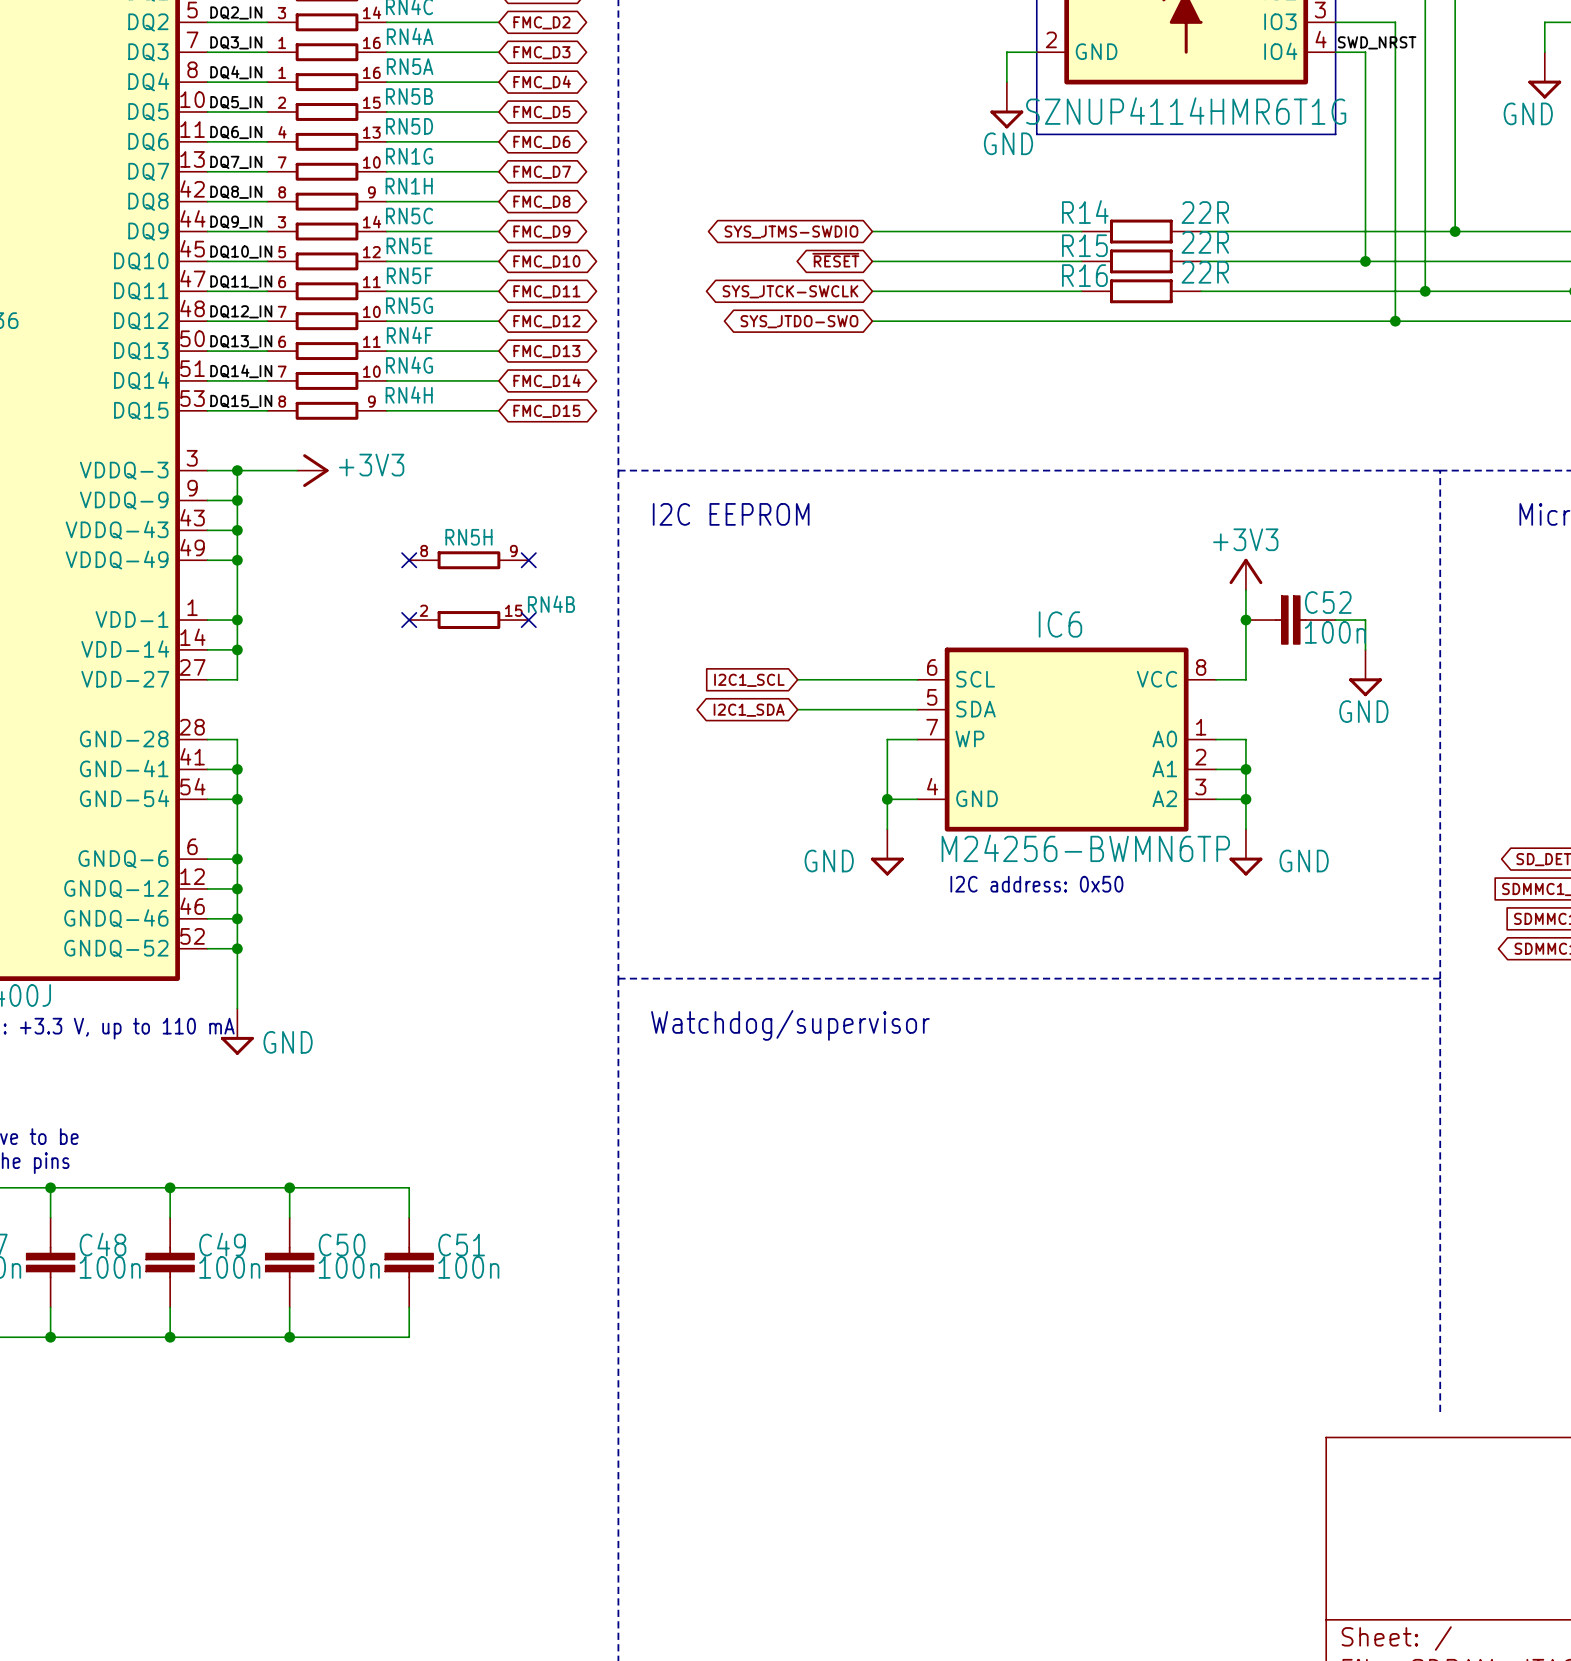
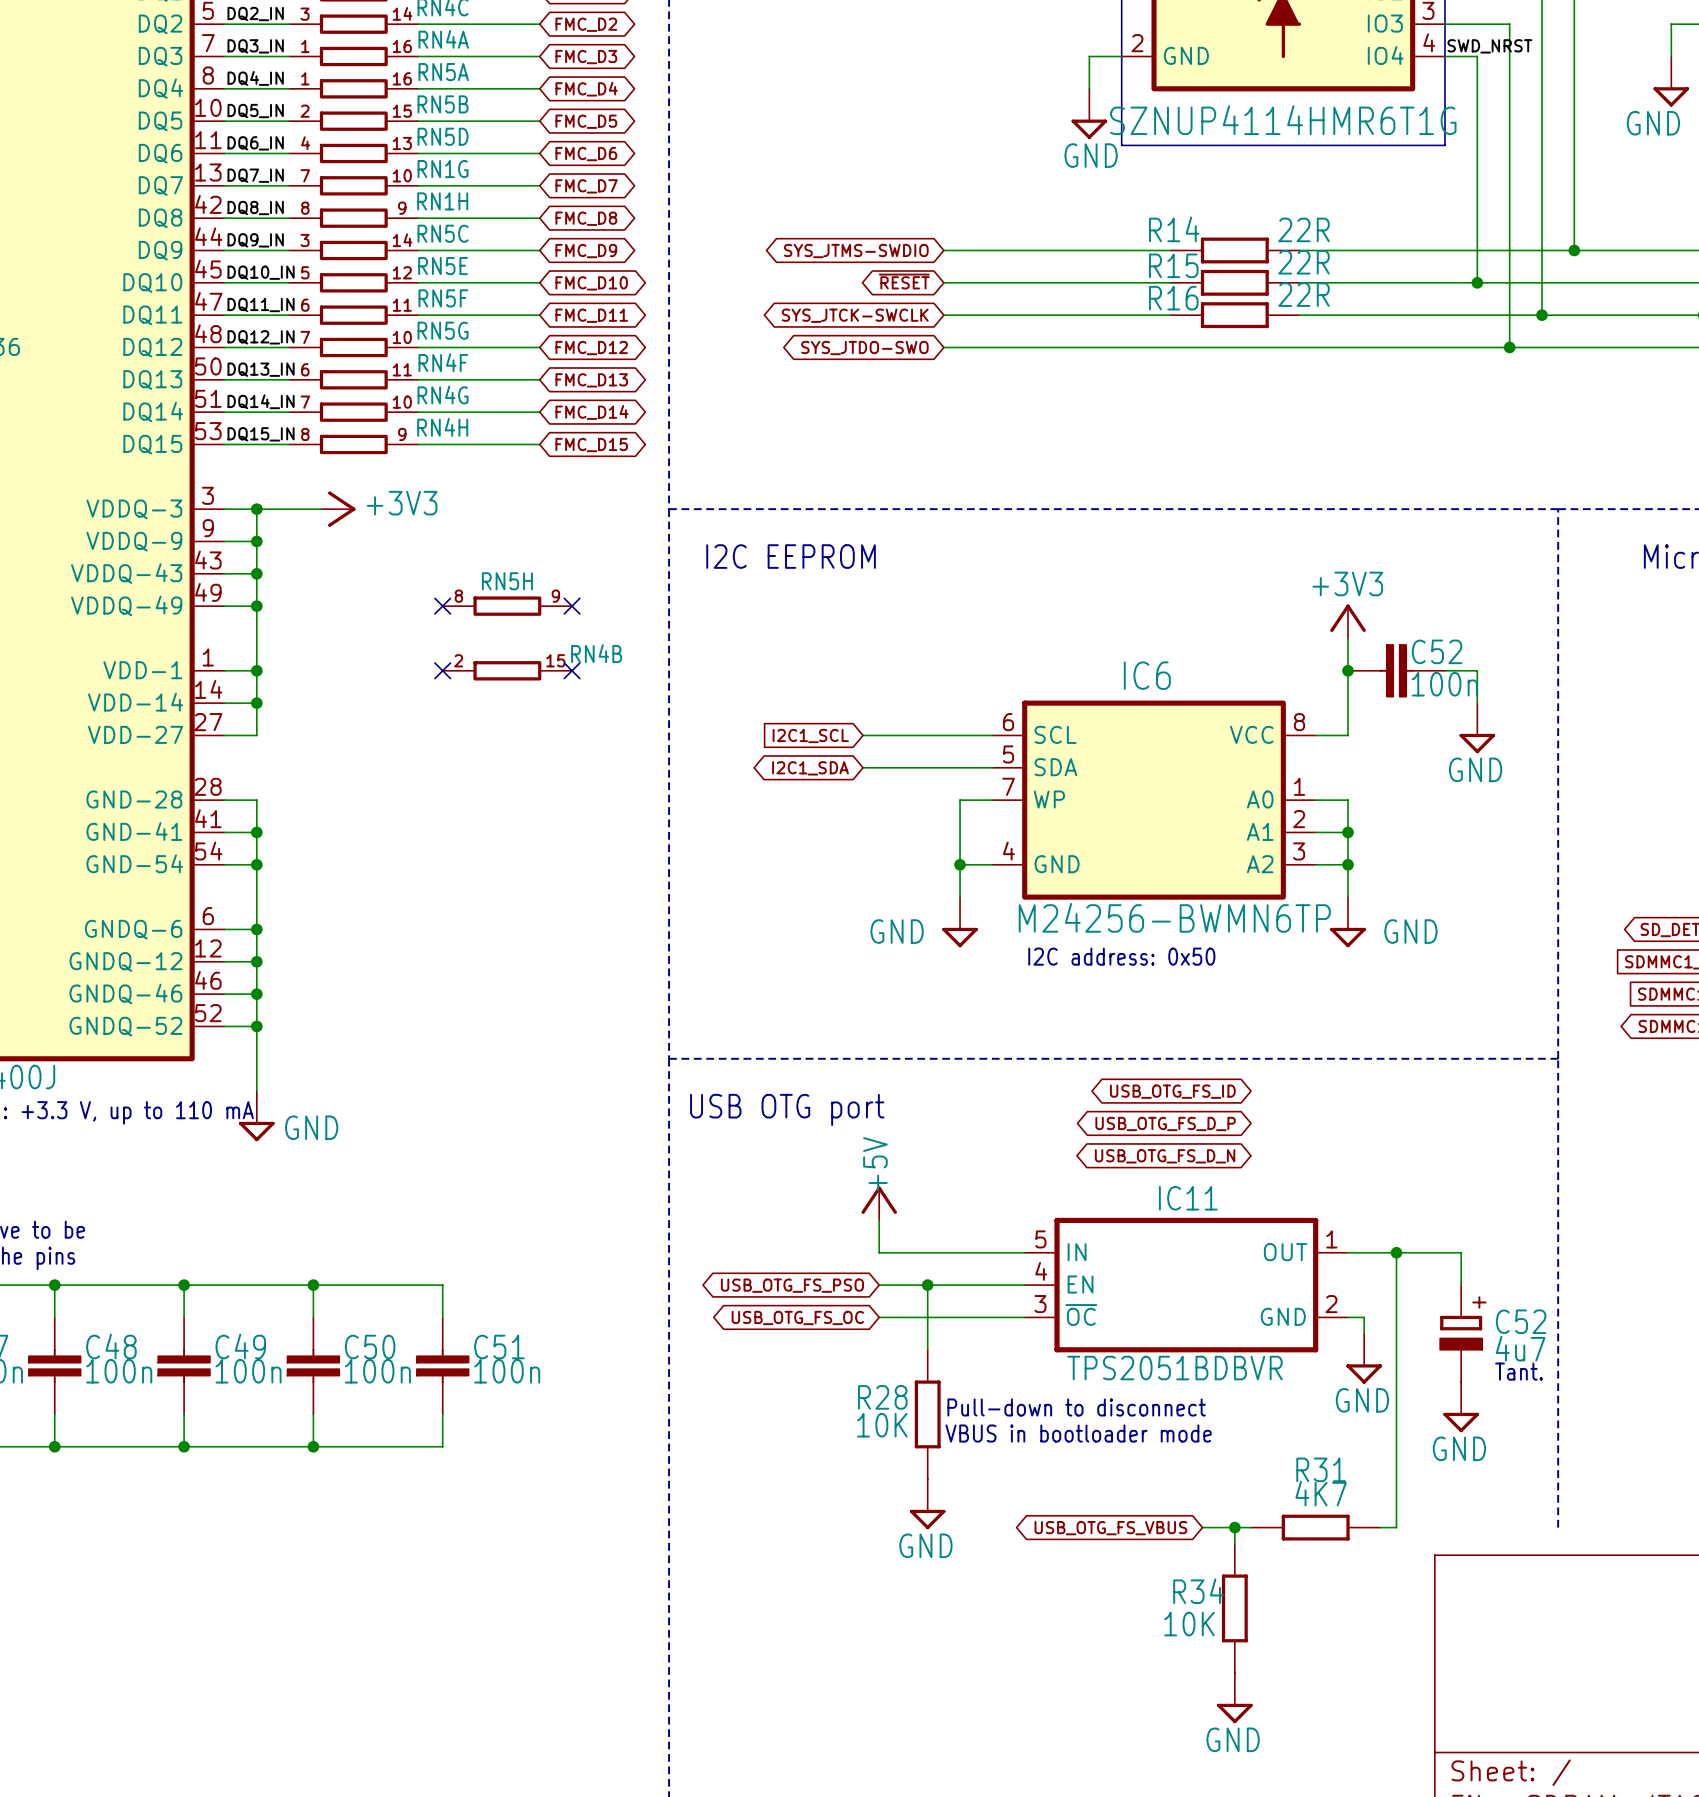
global label: none -> USB_OTG_FS_ID (1172, 1091)
text: none -> USB OTG port (787, 1109)
text: Watchdog/supervisor (790, 1025) -> none
global label: none -> USB_OTG_FS_D_P (1165, 1123)
global label: none -> USB_OTG_FS_D_N (1165, 1156)
power symbol: none -> +5V (879, 1203)
wire: none -> (879, 1220) (879, 1252) (1024, 1252)
wire: none -> (1348, 1252) (1461, 1252) (1461, 1285)
wire: none -> (1396, 1252) (1396, 1527) (1380, 1527)
junction: none -> (1396, 1252)
wire: none -> (879, 1285) (1024, 1285)
wire: none -> (927, 1285) (927, 1349)
junction: none -> (927, 1285)
IC11: none -> TPS2051BDBVR (1186, 1285)
global label: none -> USB_OTG_FS_PSO (792, 1285)
wire: none -> (879, 1317) (1024, 1317)
wire: none -> (1348, 1317) (1364, 1317) (1364, 1333)
global label: none -> USB_OTG_FS_OC (797, 1317)
C52: none -> 4u7 (1461, 1333)
power symbol: none -> GND (1364, 1358)
text: none -> Tant. (1518, 1371)
text: none -> Pull-down to disconnect (1076, 1407)
power symbol: none -> GND (1461, 1407)
R28: none -> 10K (927, 1414)
text: none -> VBUS in bootloader mode (1078, 1433)
power symbol: none -> GND (927, 1504)
wire: none -> (1202, 1527) (1251, 1527)
wire: none -> (1234, 1527) (1234, 1543)
junction: none -> (1234, 1527)
R31: none -> 4K7 (1315, 1527)
global label: none -> USB_OTG_FS_VBUS (1110, 1528)
R34: none -> 10K (1234, 1608)
power symbol: none -> GND (1234, 1698)

